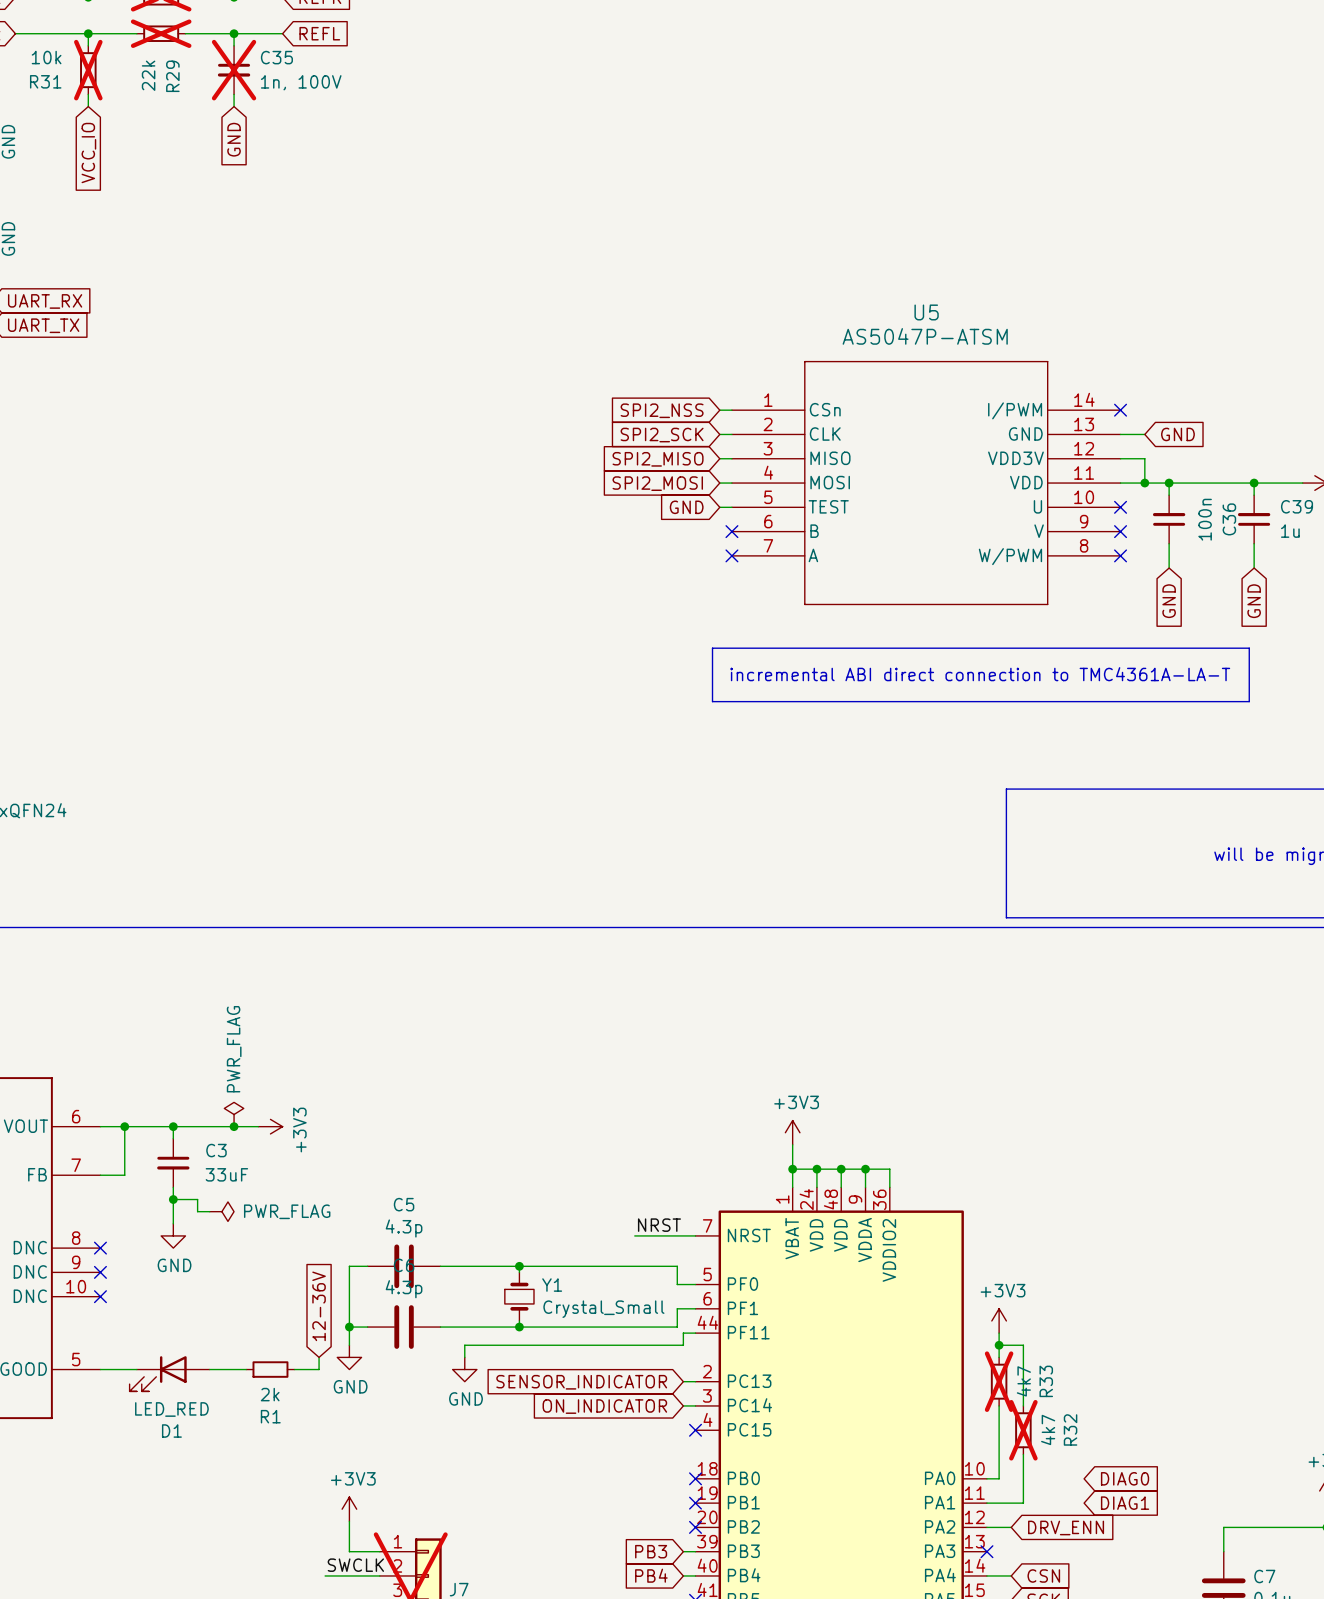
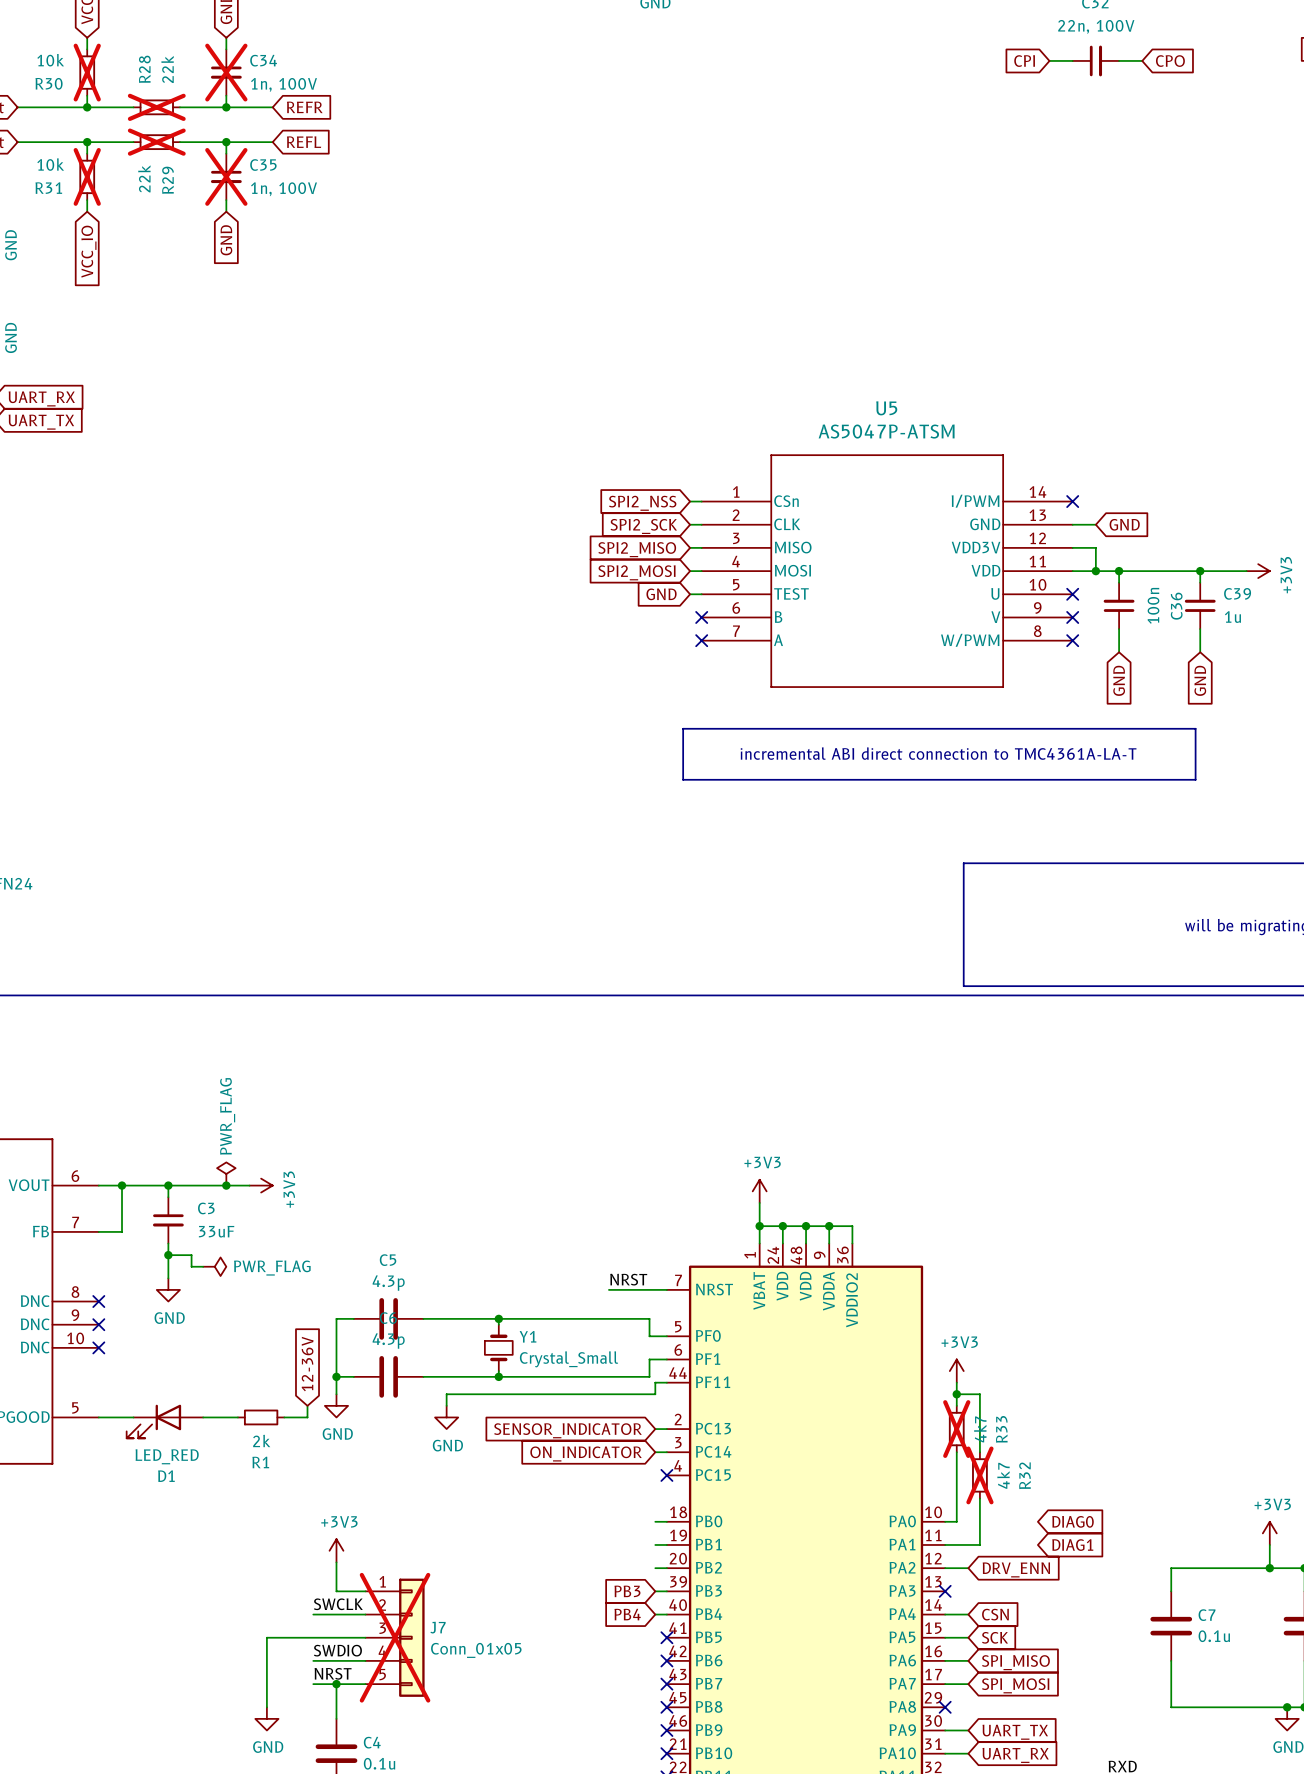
wire: none -> (655, 1521) (666, 1521)
no-connect mark: (695, 1478) -> none
wire: none -> (655, 1544) (666, 1544)
no-connect mark: (695, 1503) -> none
wire: none -> (655, 1568) (666, 1568)
no-connect mark: (695, 1527) -> none

